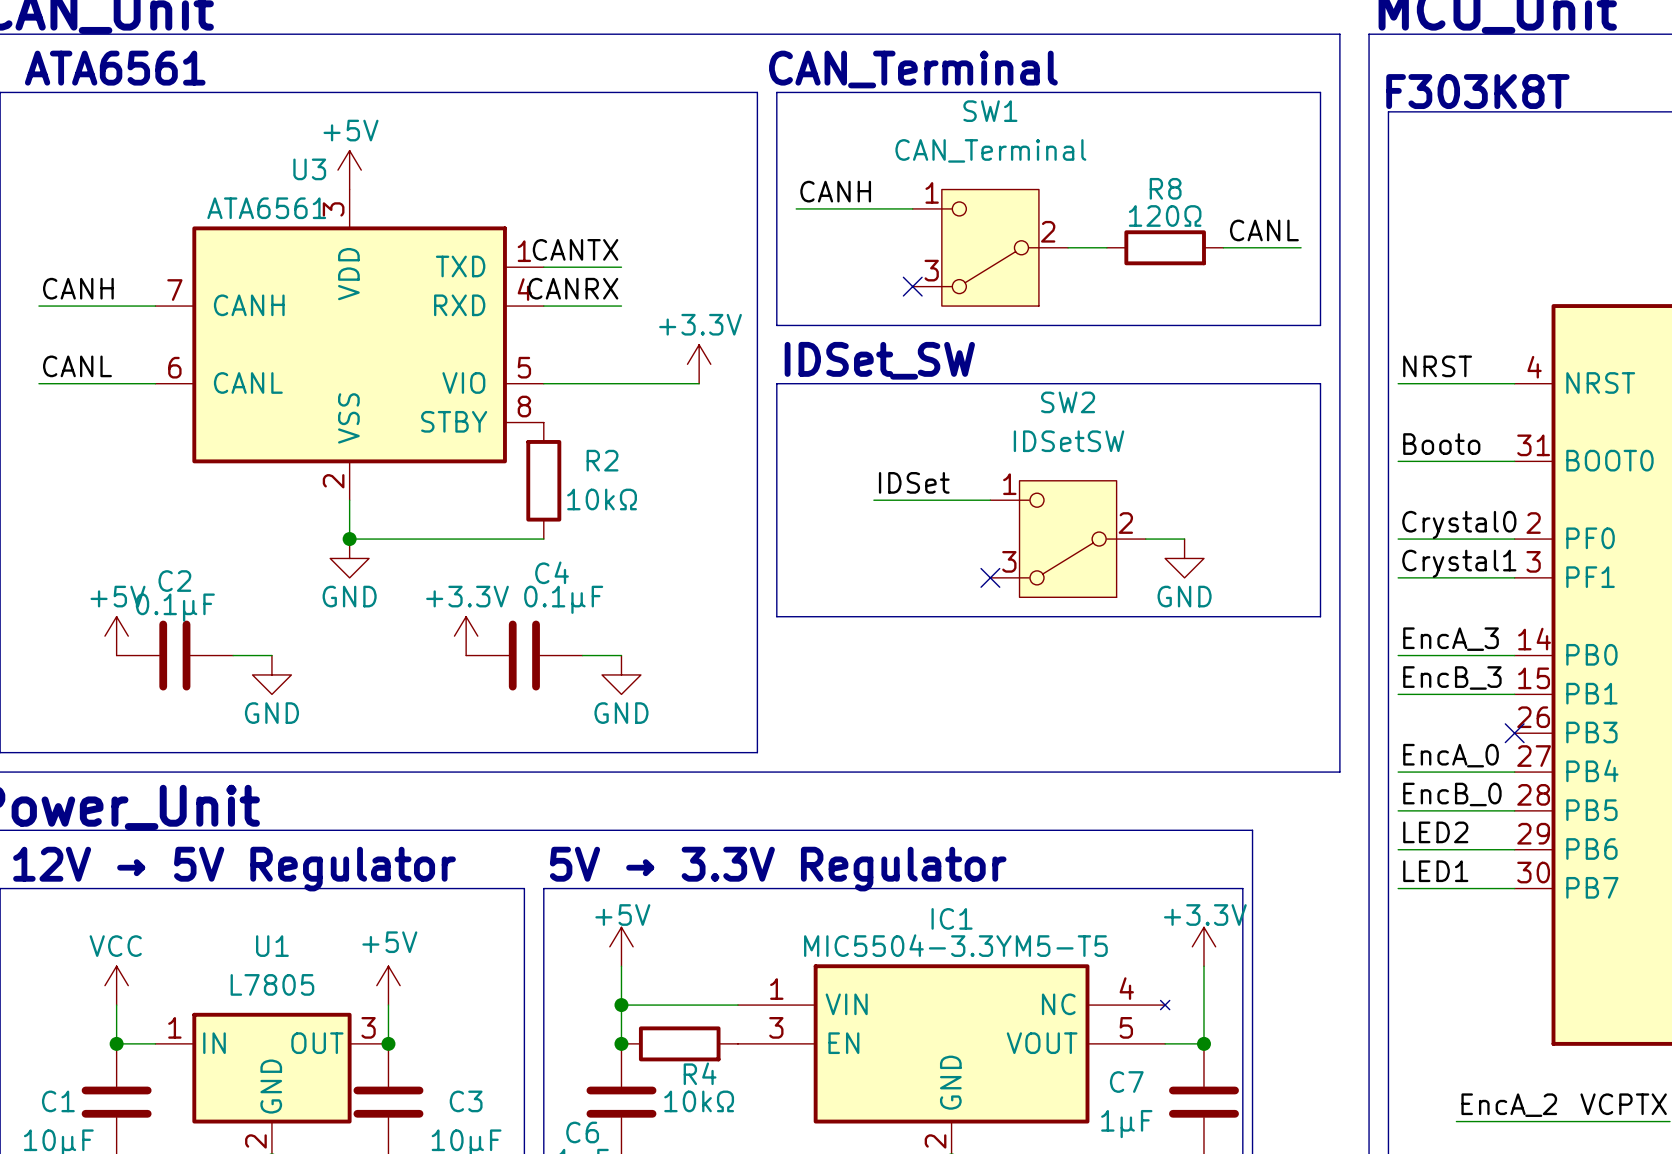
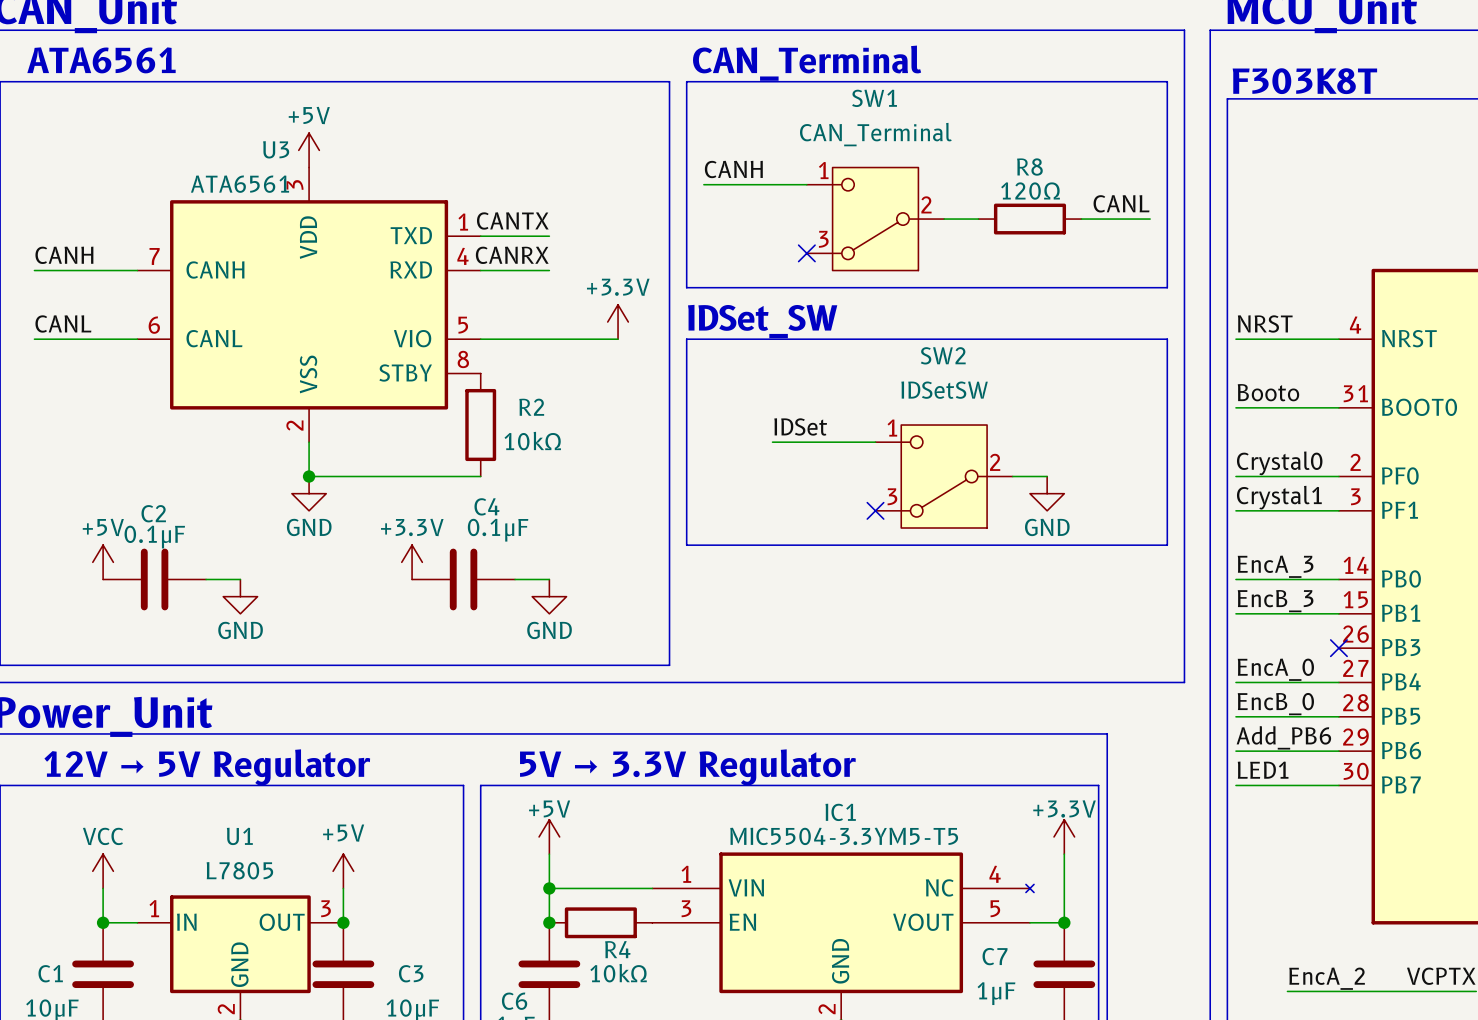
label: LED2 (1435, 832) -> Add_PB6 (1283, 737)

